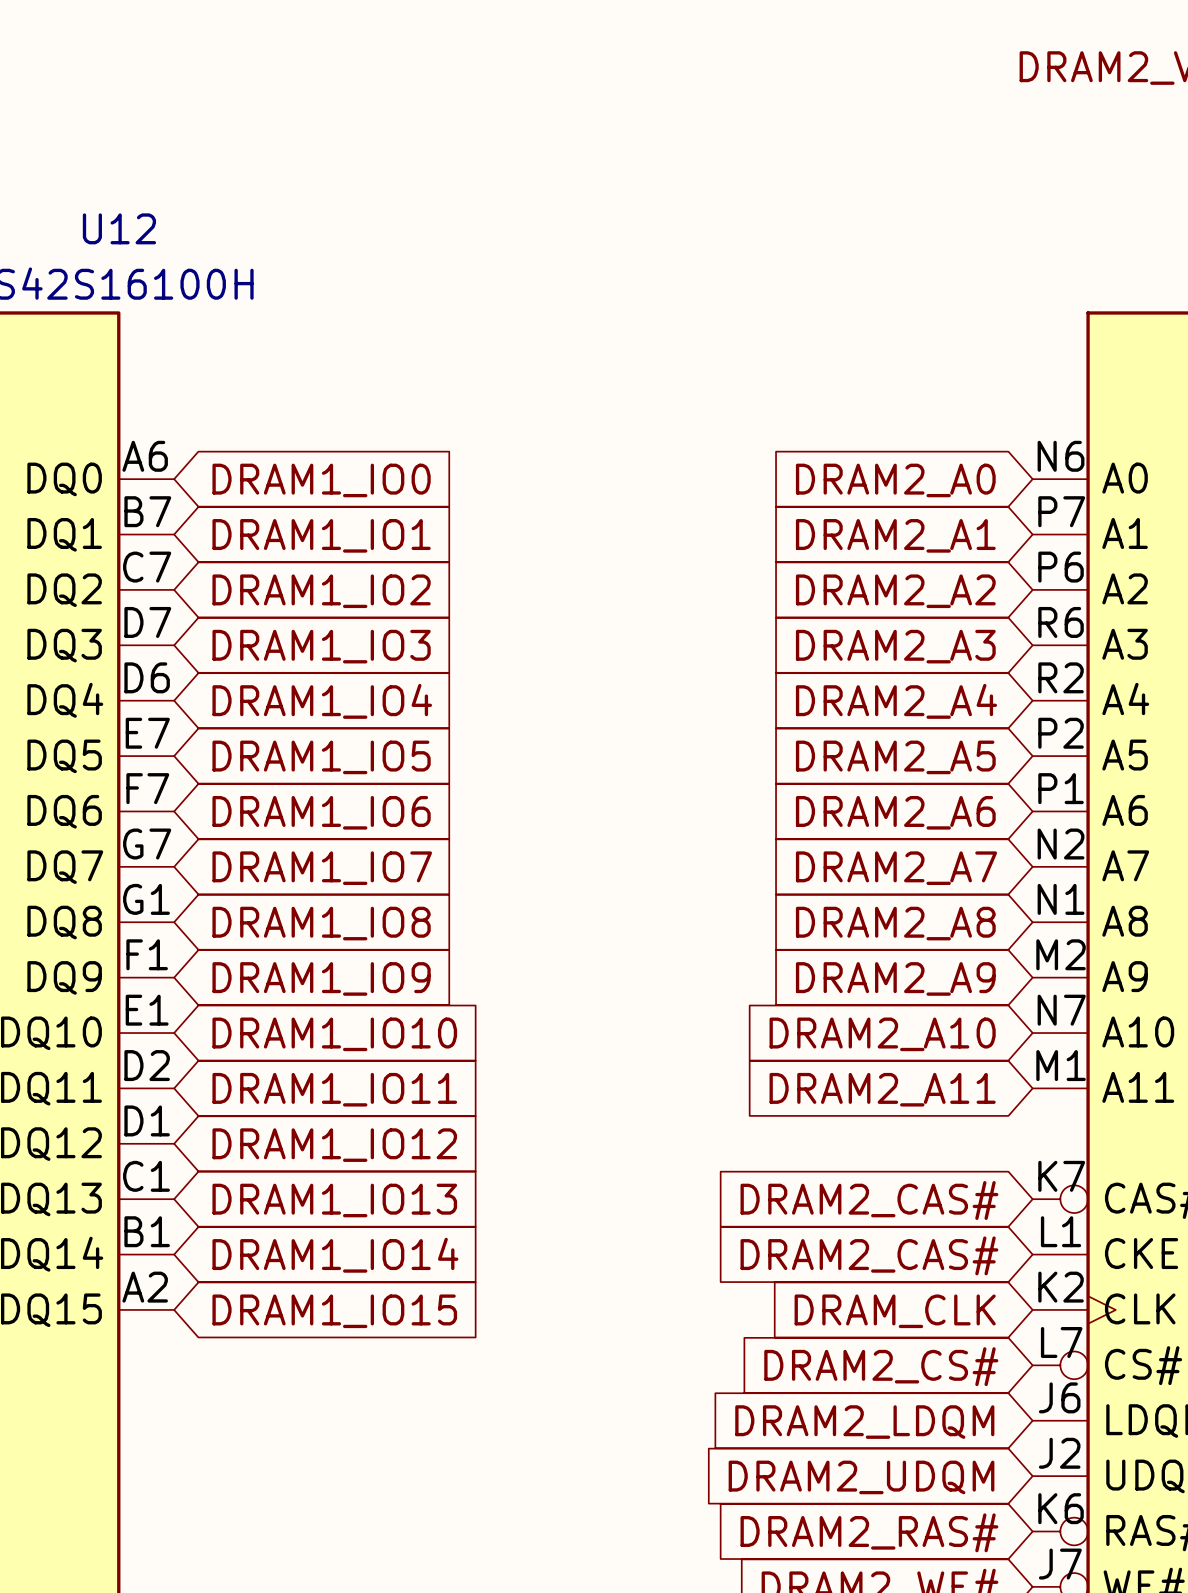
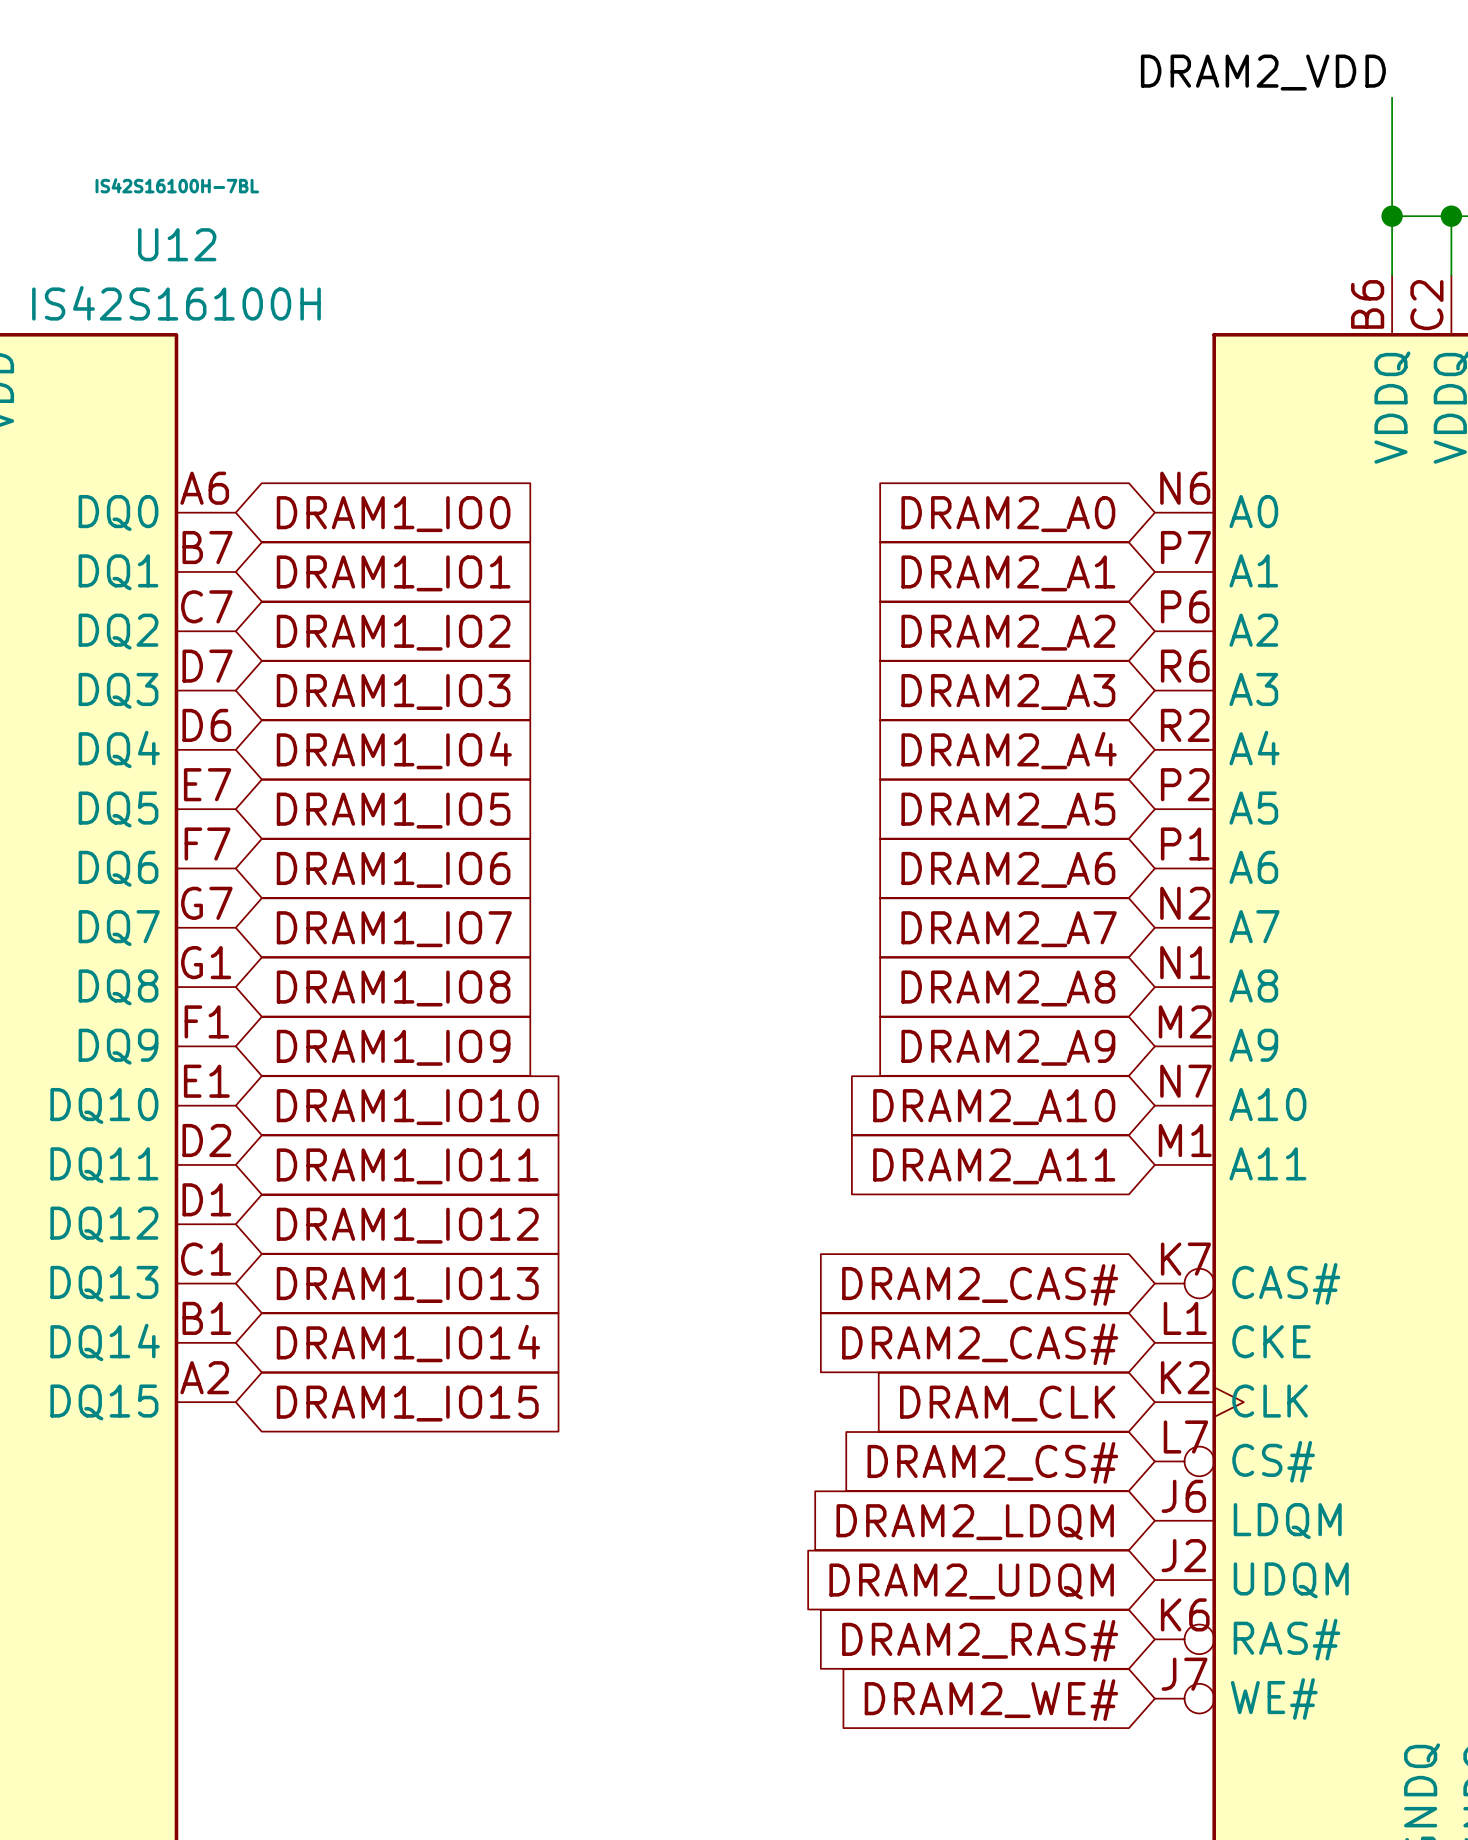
U12 text: none -> IS42S16100H-7BL (177, 185)

